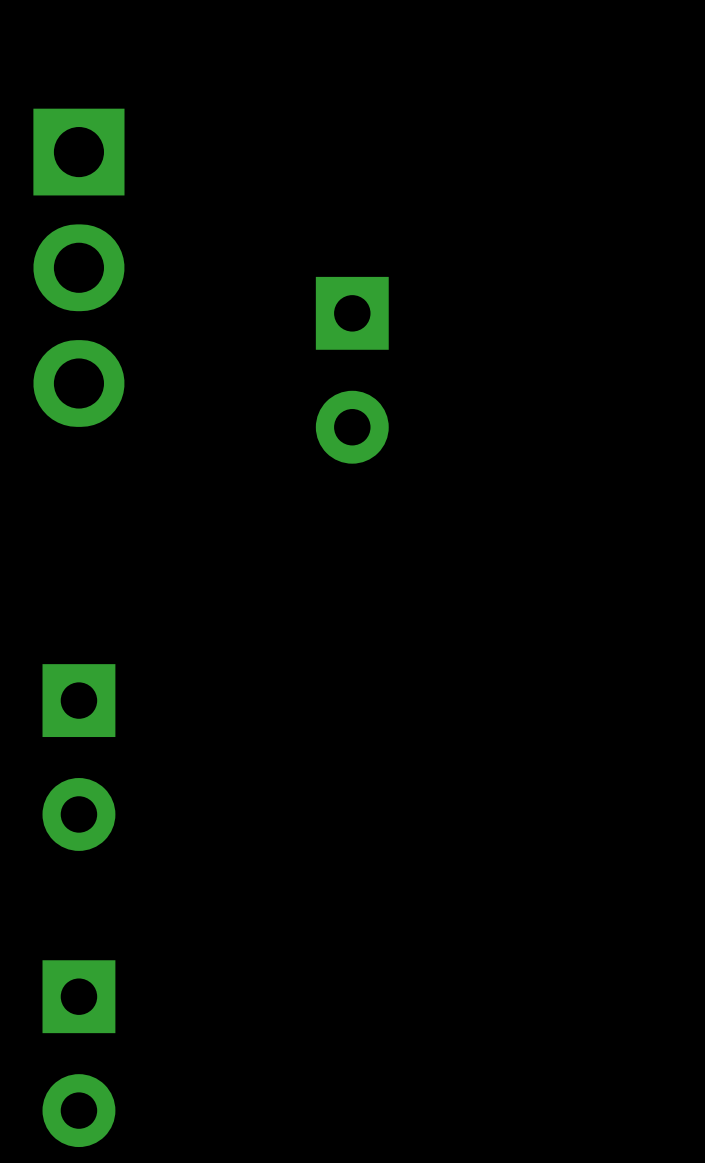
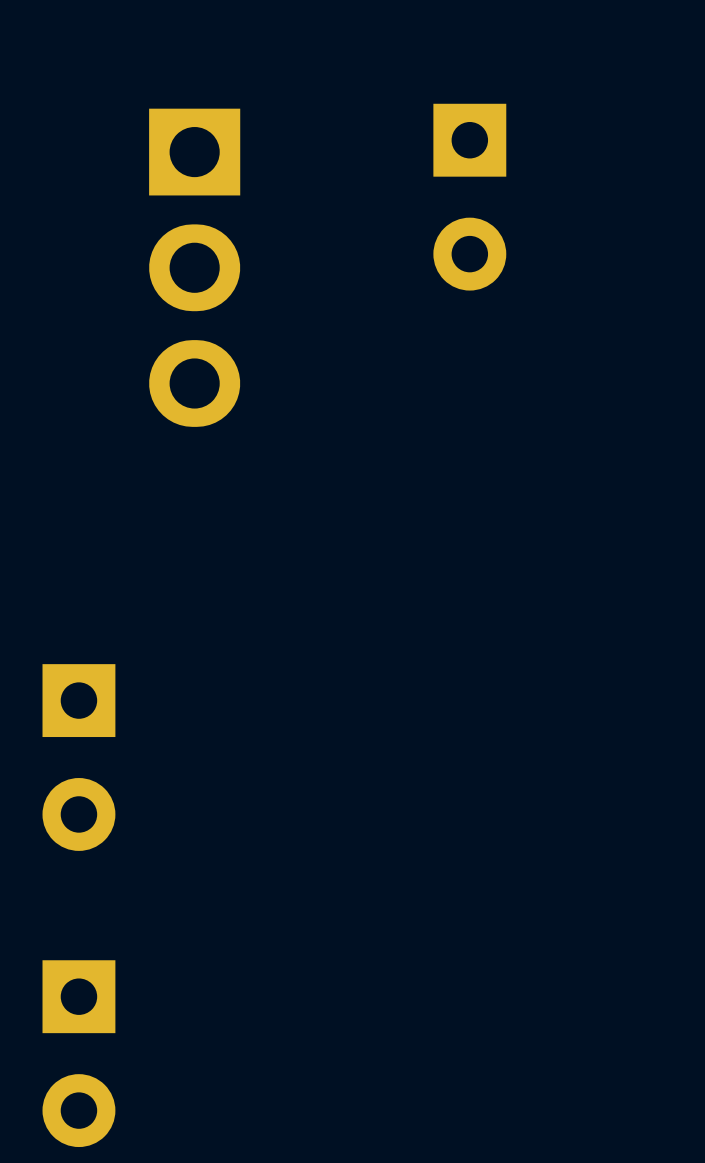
part position: (78, 267) -> (194, 267)
part position: (352, 370) -> (469, 197)

